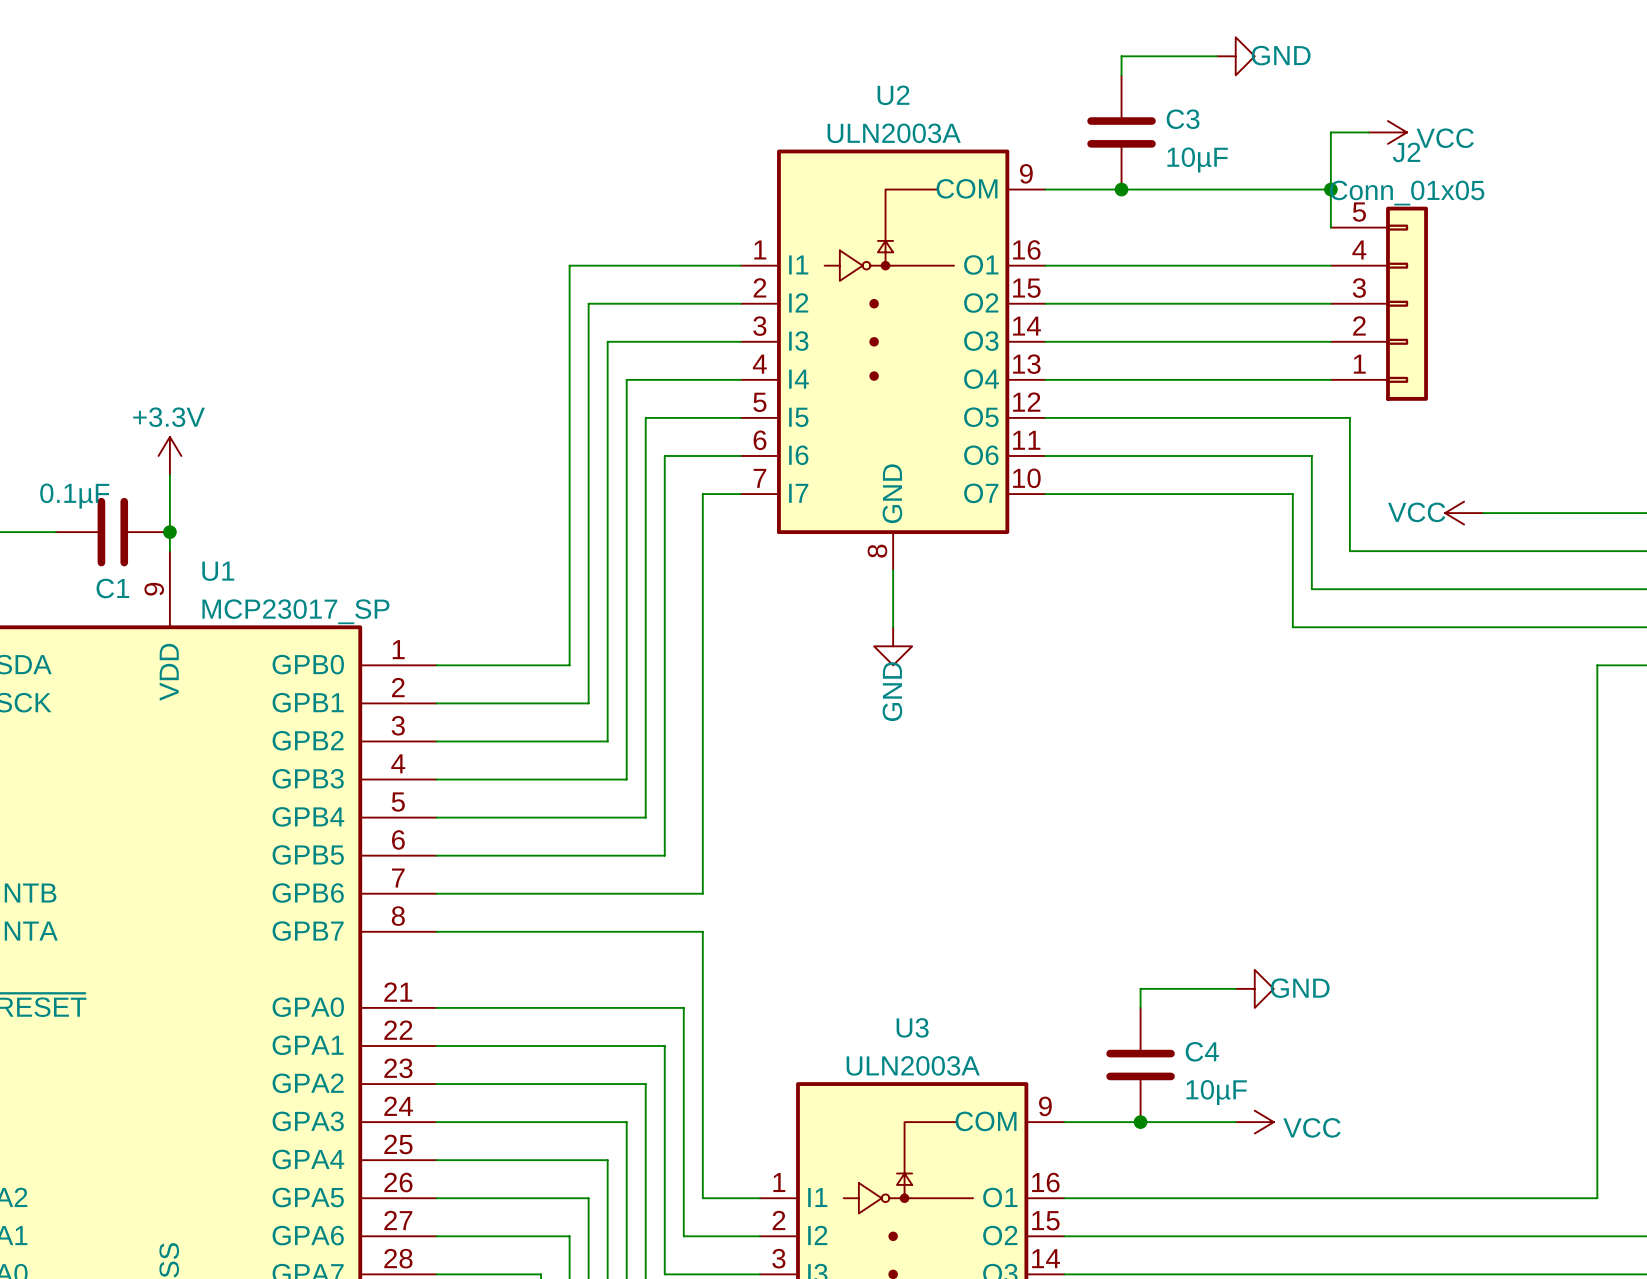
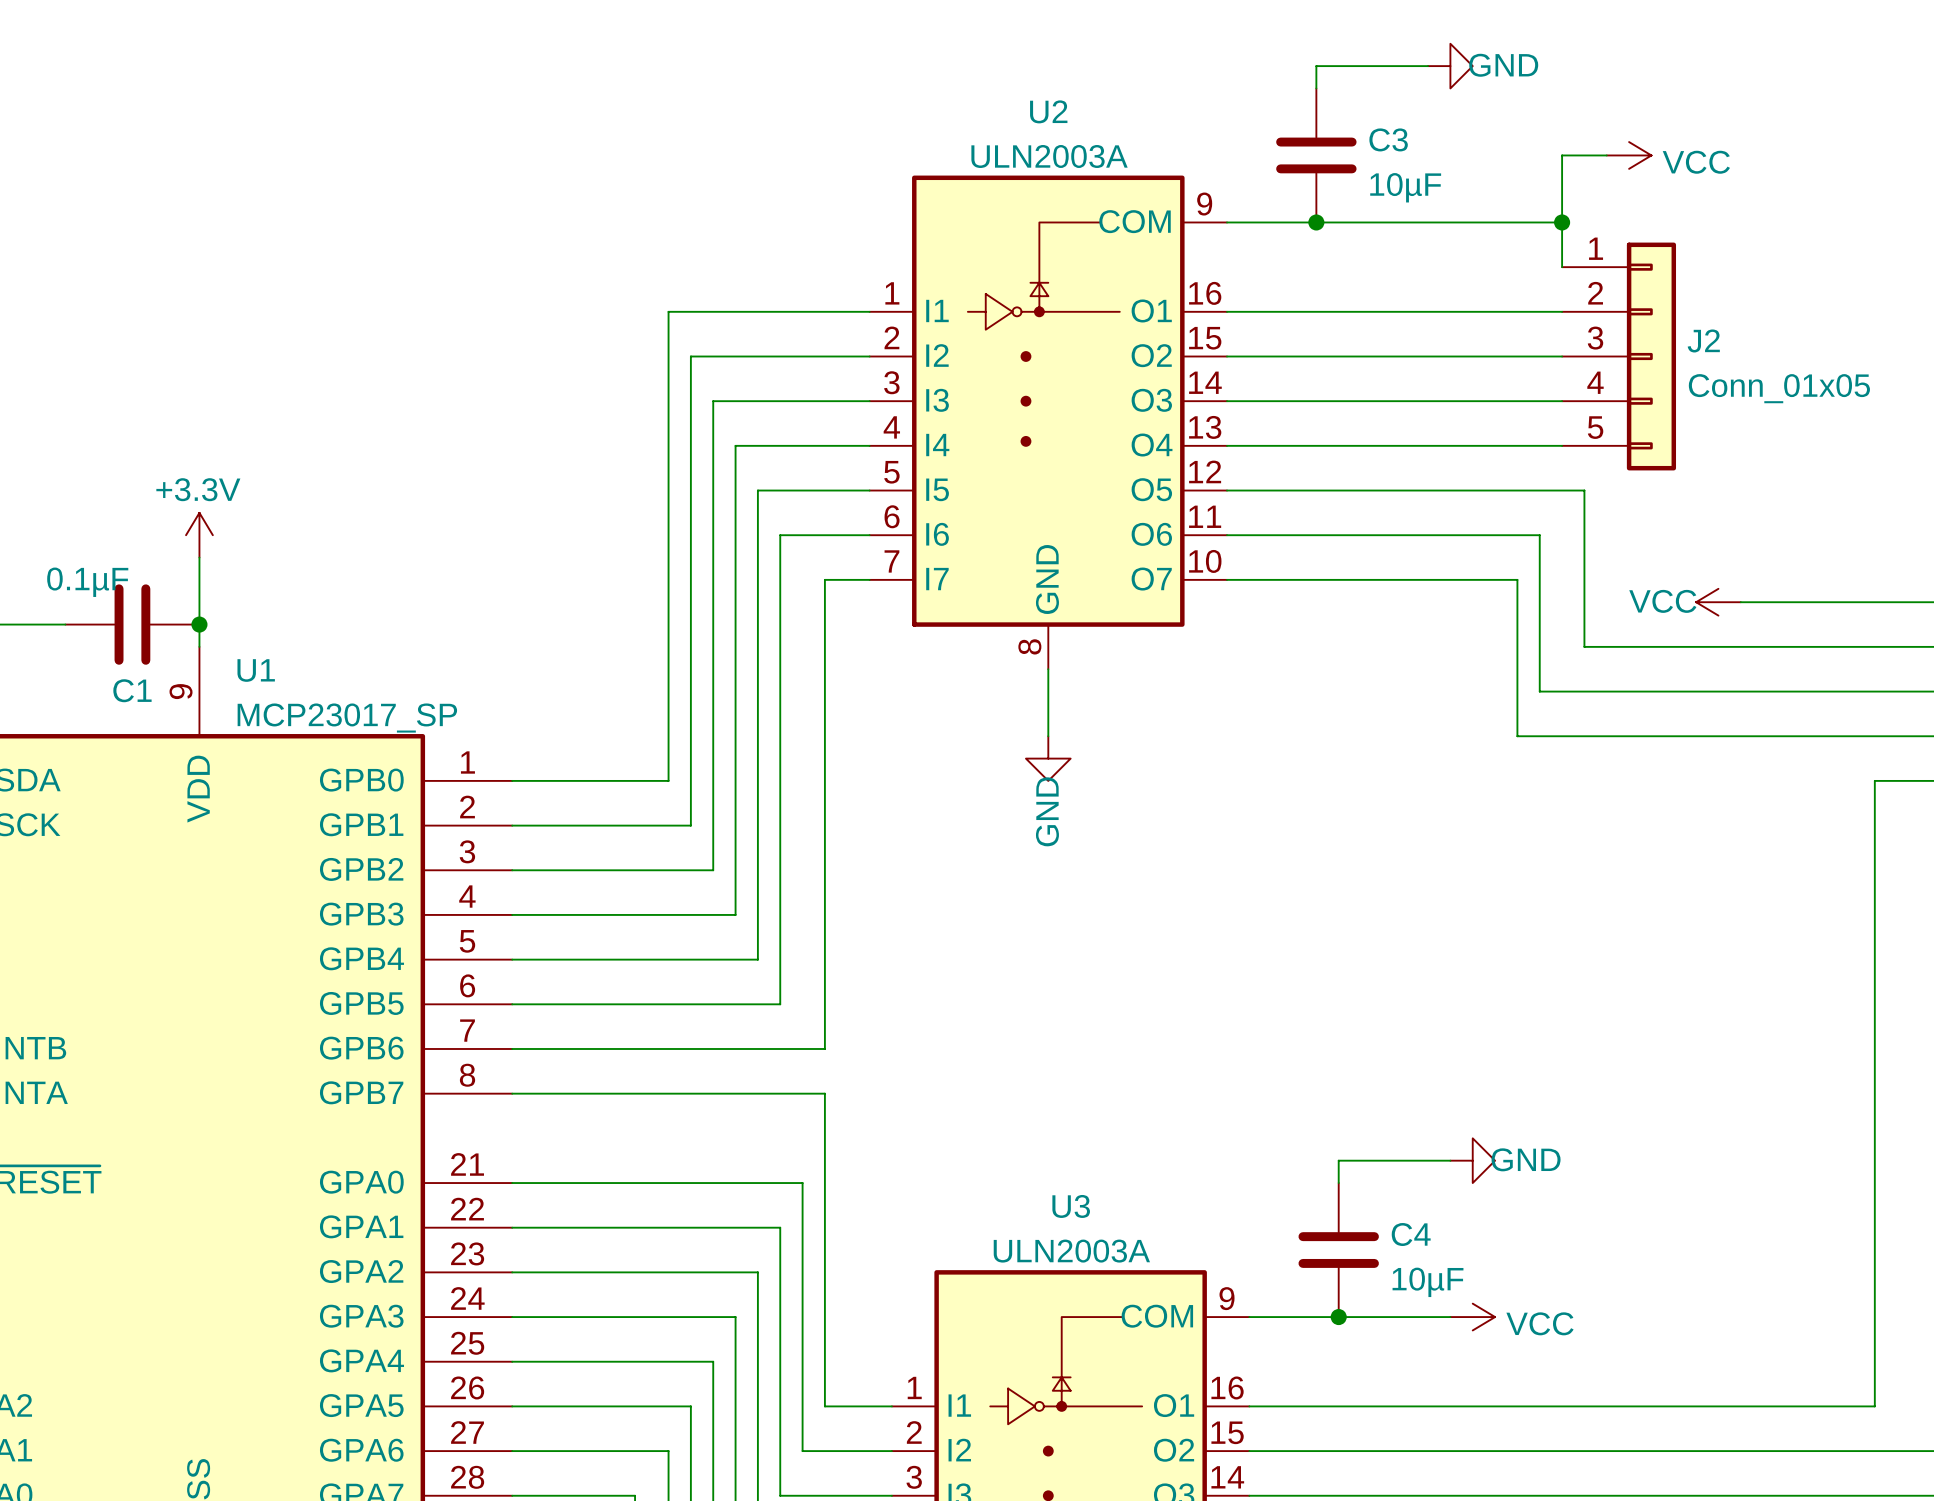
J2 name position: J2 (1406, 152) -> J2 (1703, 340)
J2 value position: Conn_01x05 (1407, 193) -> Conn_01x05 (1779, 388)
J2 flip: as is (1407, 303) -> up-down (1651, 356)

